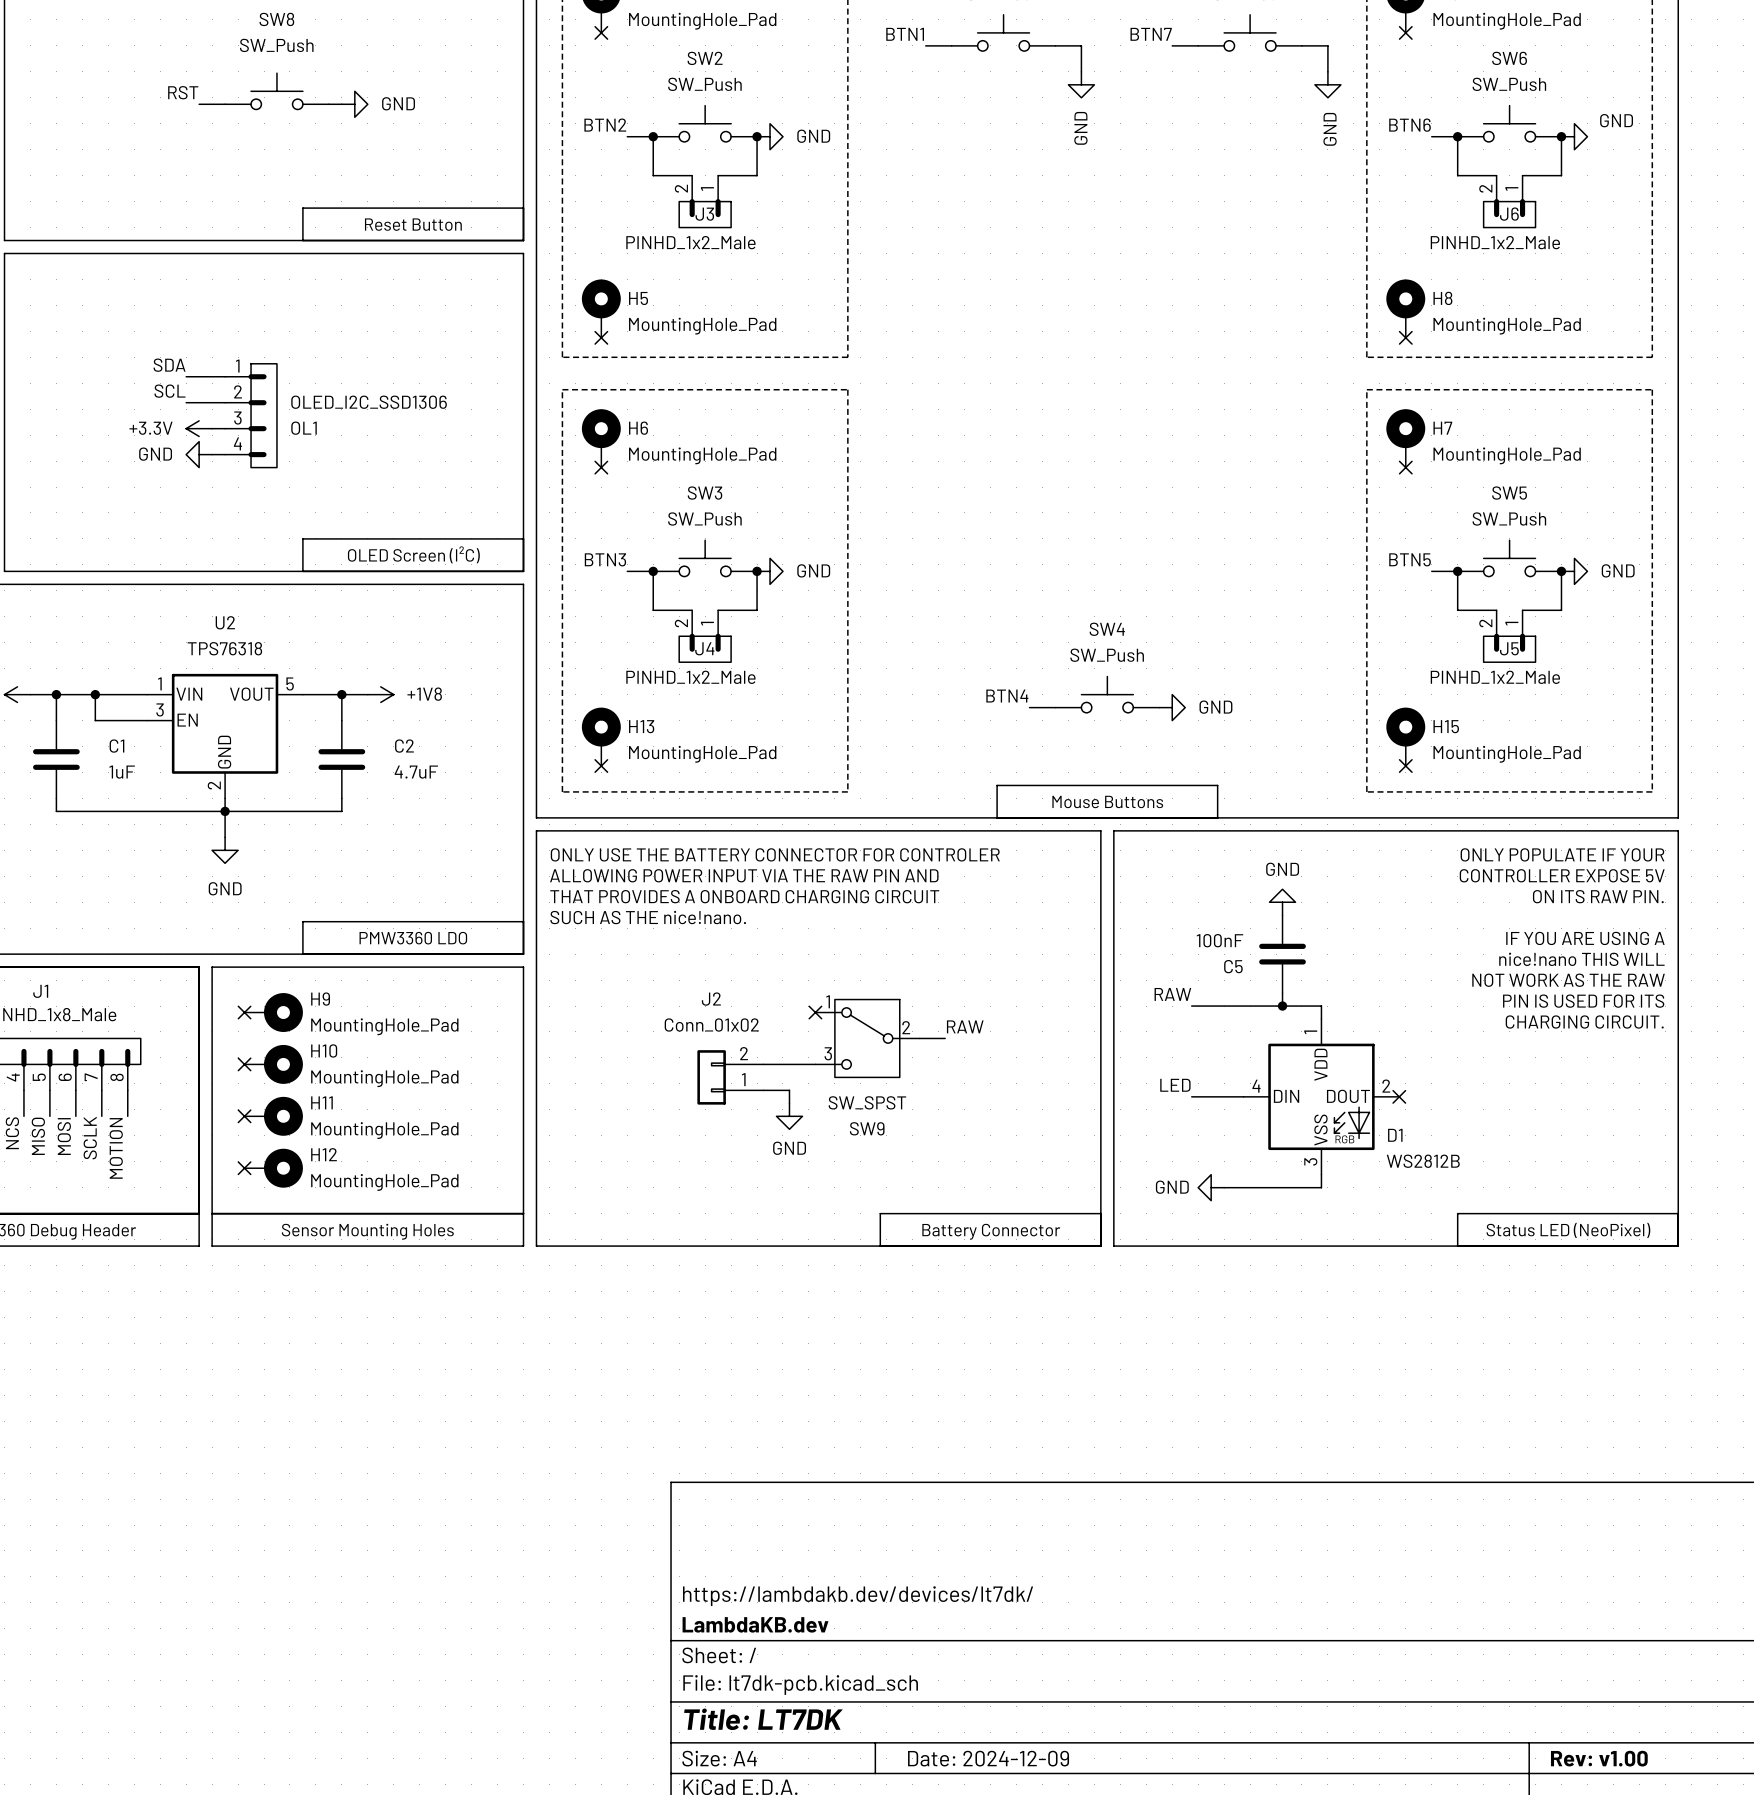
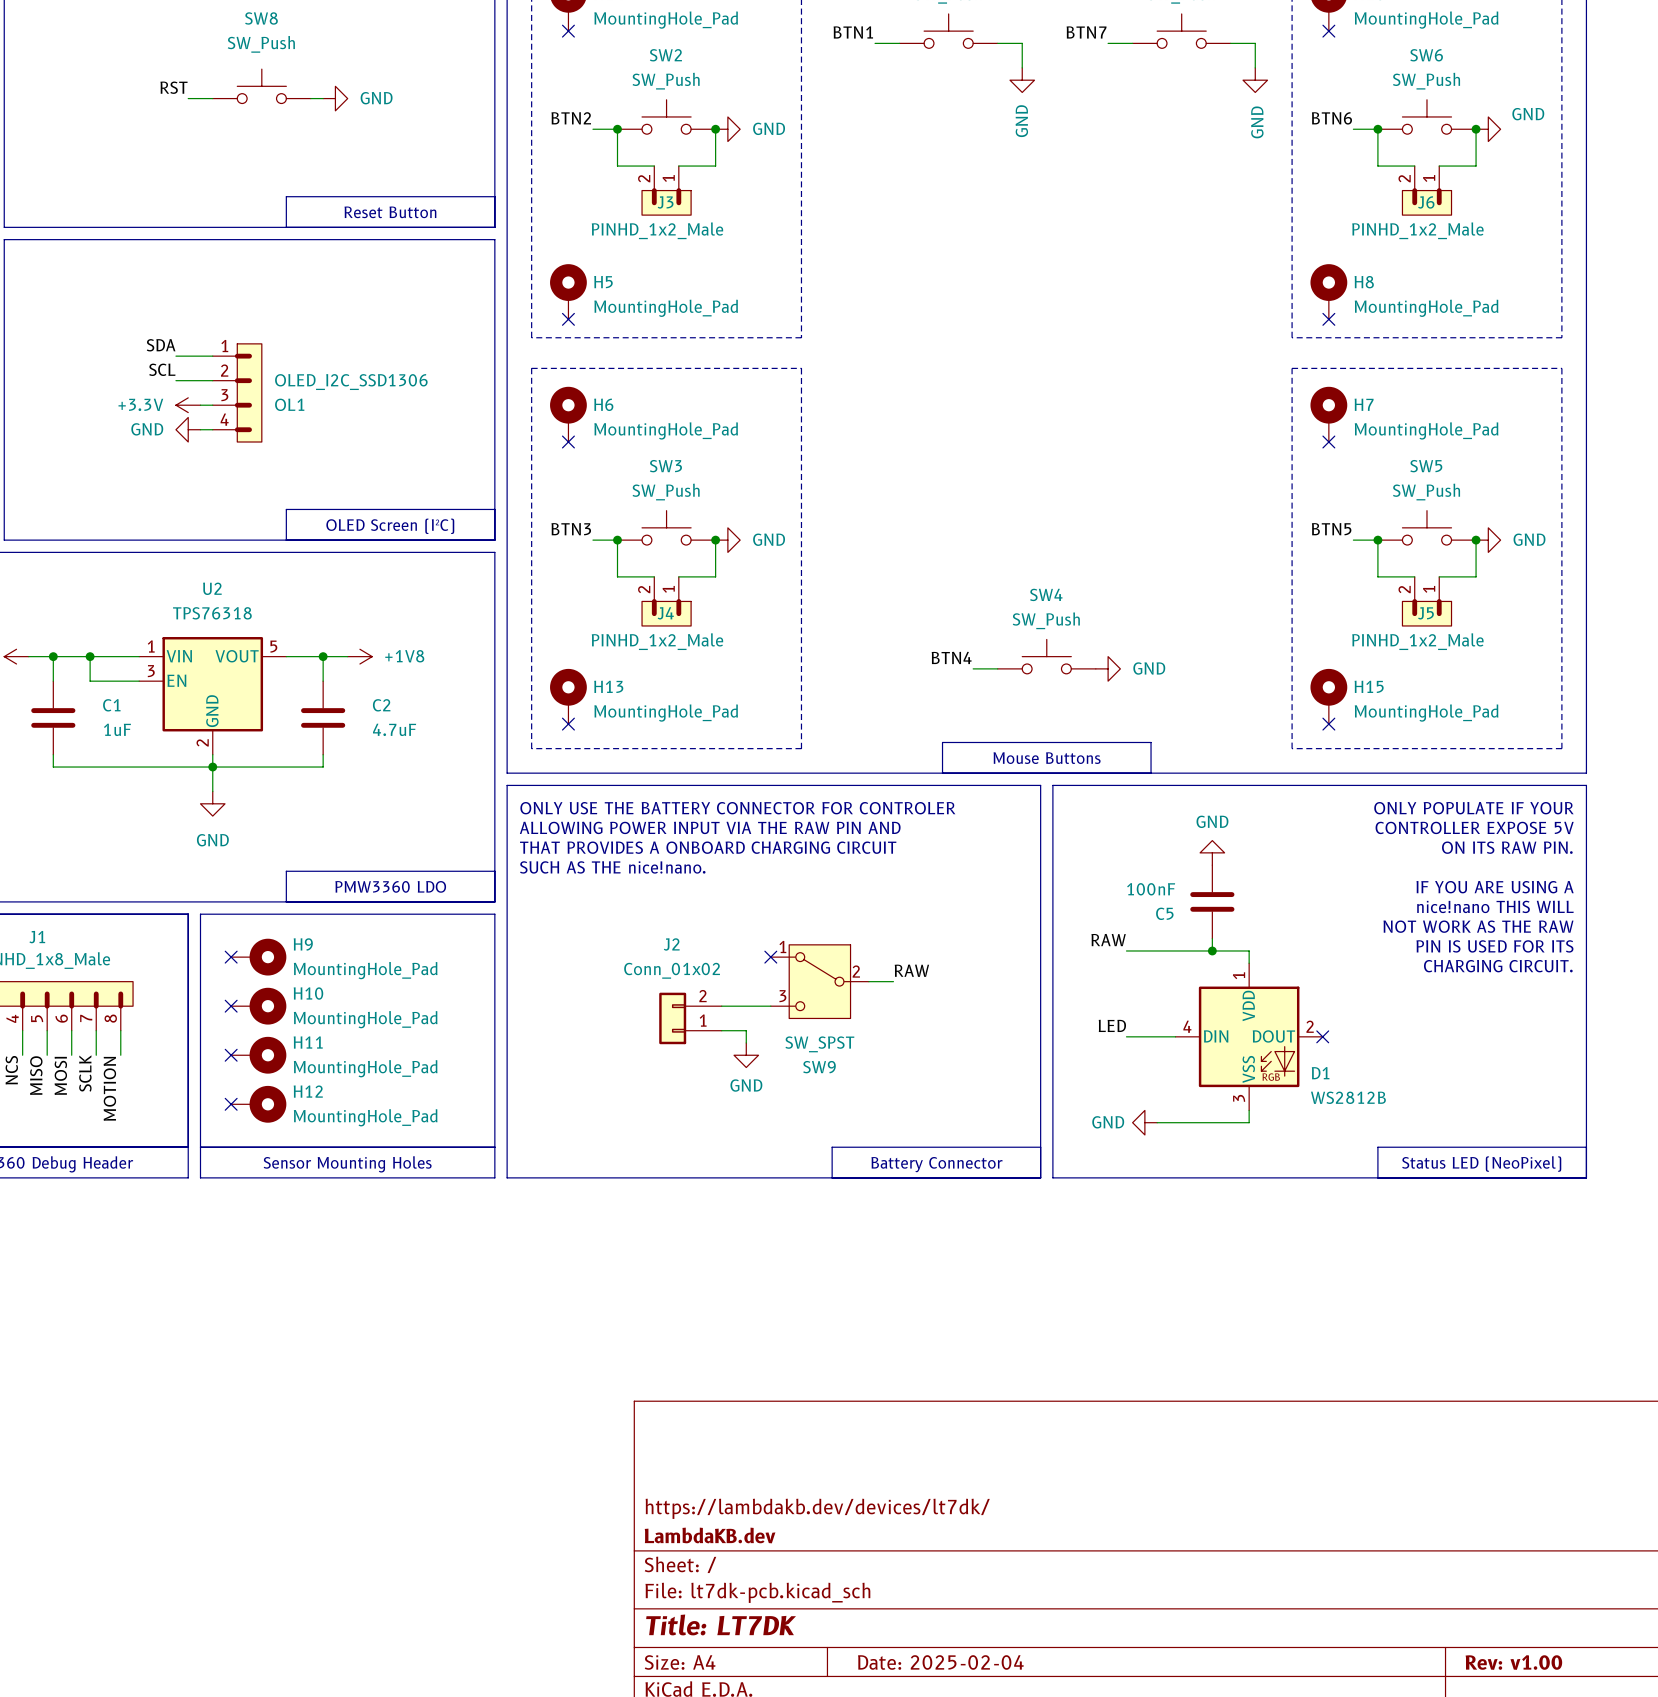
title block: Date: 2024-12-09 (988, 1758) -> Date: 2025-02-04 (940, 1662)

